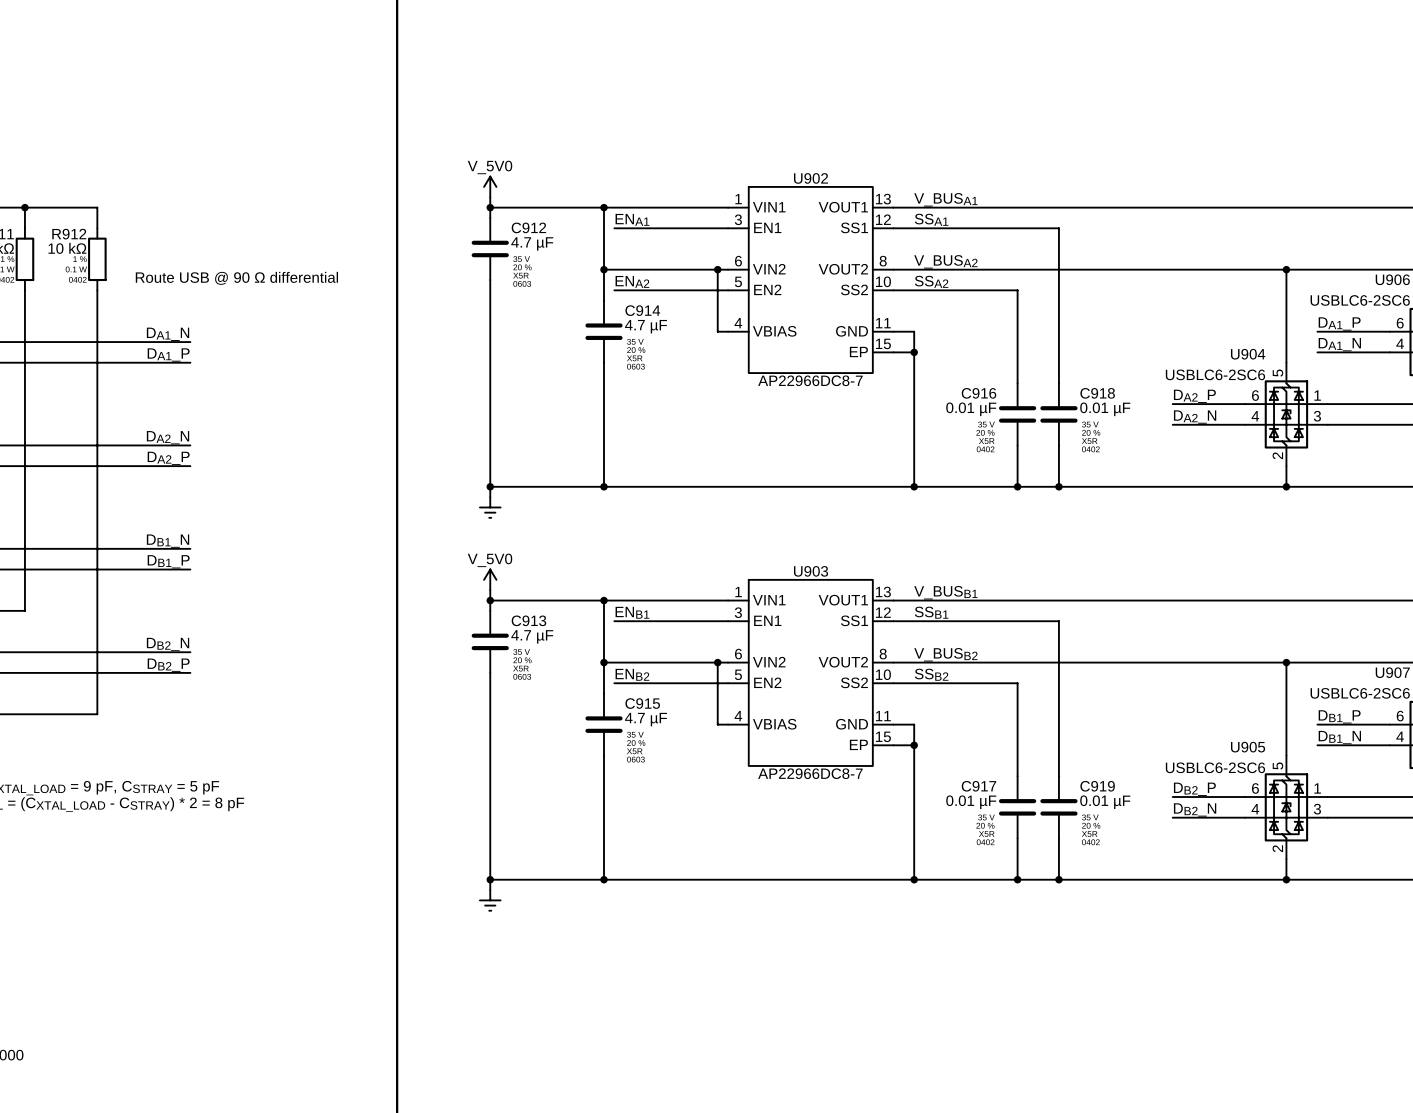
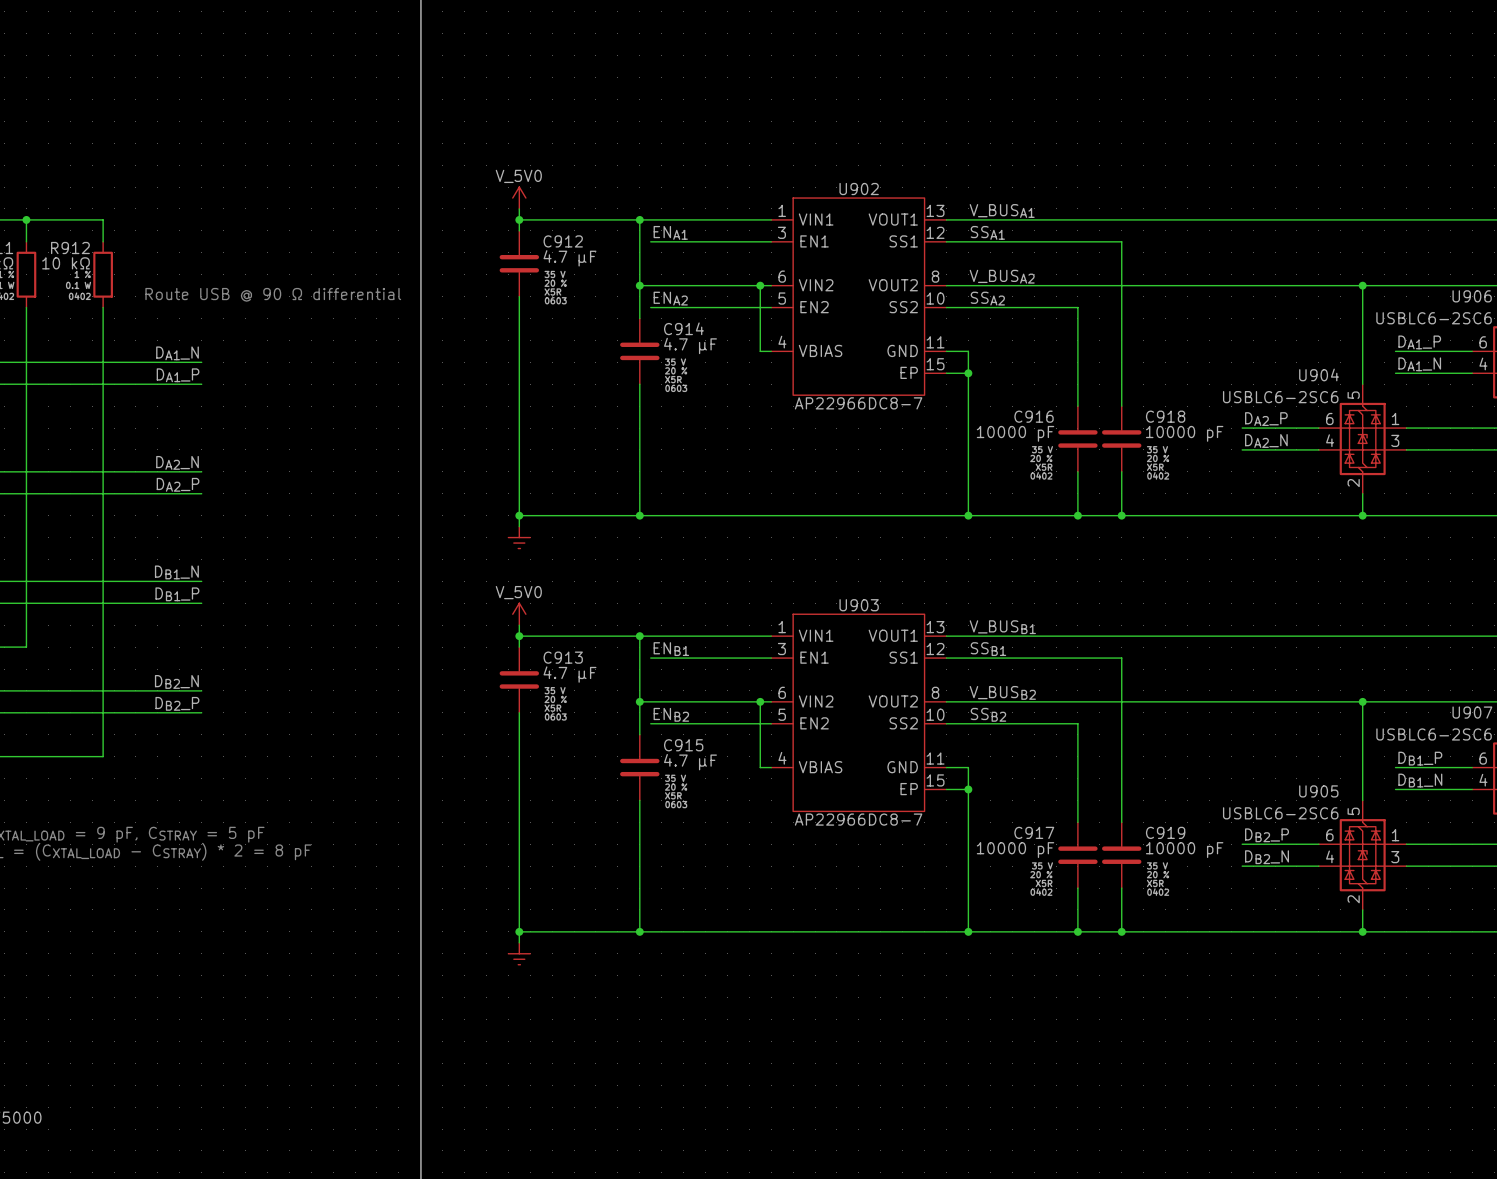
C916 value: 0.01 µF (971, 409) -> 10000 pF (1015, 433)
C918 value: 0.01 µF (1105, 409) -> 10000 pF (1184, 433)
C917 value: 0.01 µF (971, 802) -> 10000 pF (1015, 850)
C919 value: 0.01 µF (1105, 802) -> 10000 pF (1184, 850)

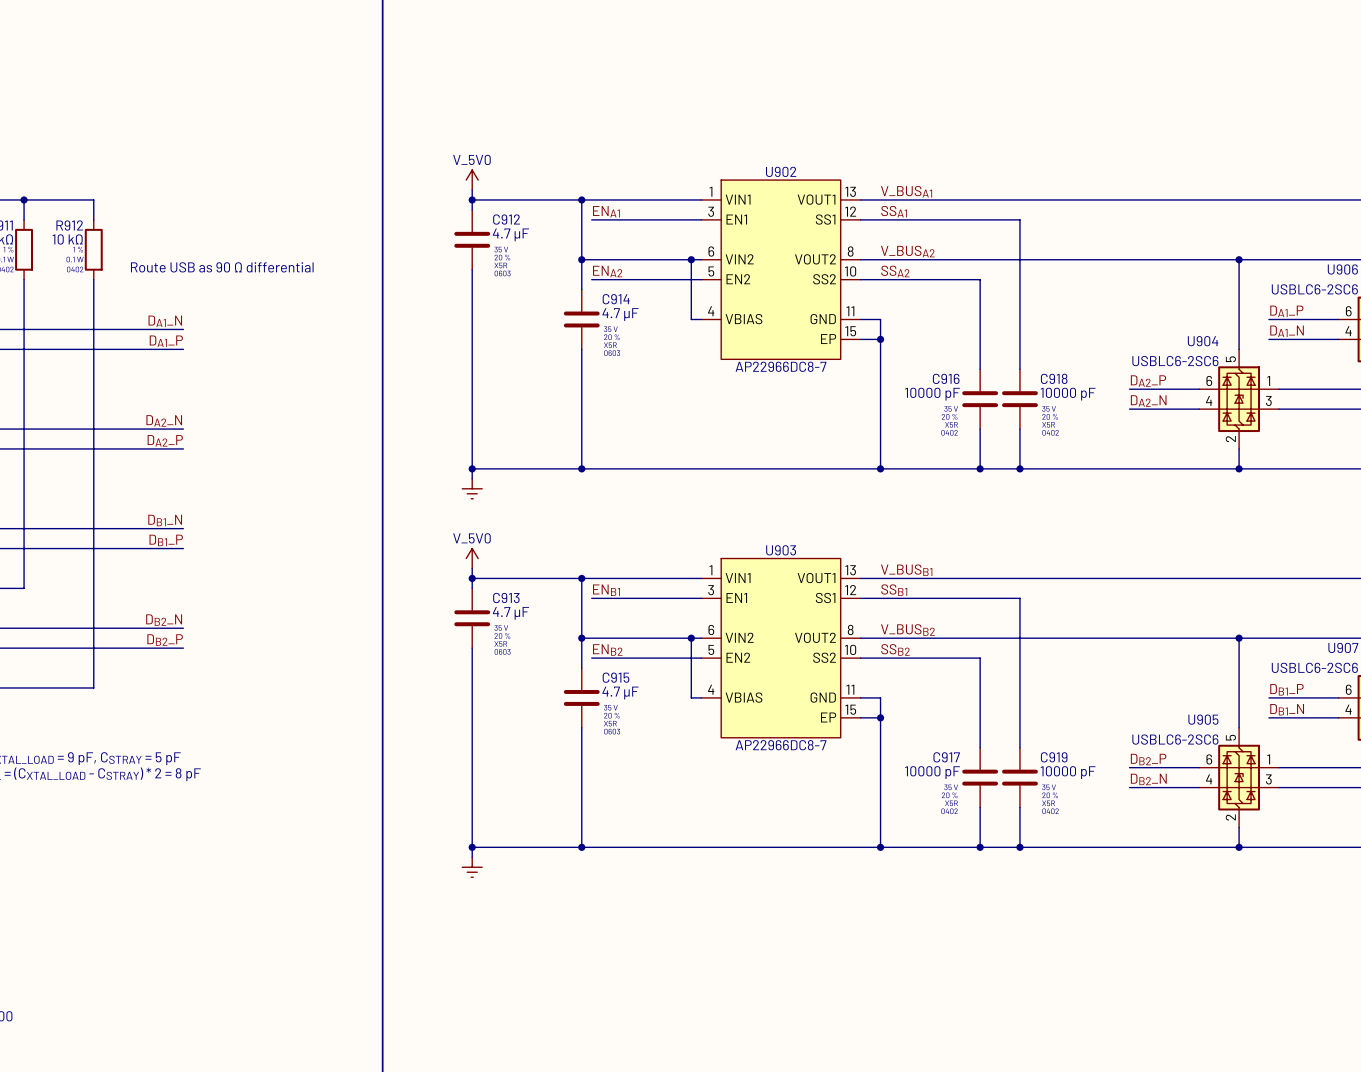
text: Route USB @ 90 Ω differential (273, 294) -> Route USB as 90 Ω differential (222, 267)

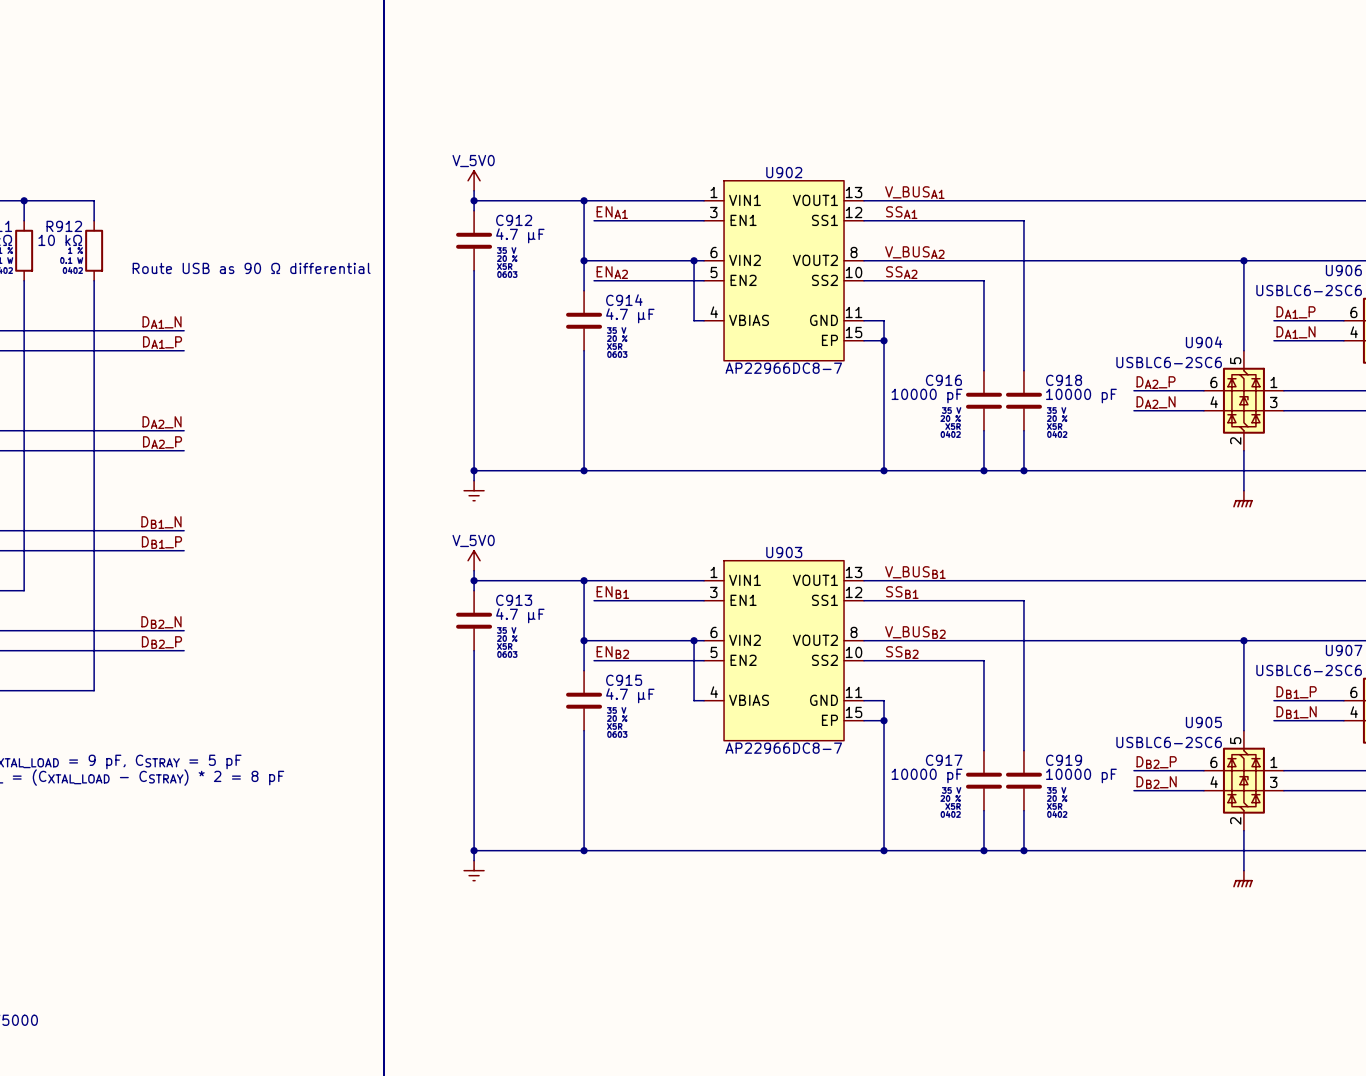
wire: none -> (1243, 470) (1243, 490)
junction: (1239, 468) -> none
power symbol: none -> (1242, 499)
wire: none -> (1243, 850) (1243, 870)
junction: (1239, 847) -> none
power symbol: none -> (1242, 879)

